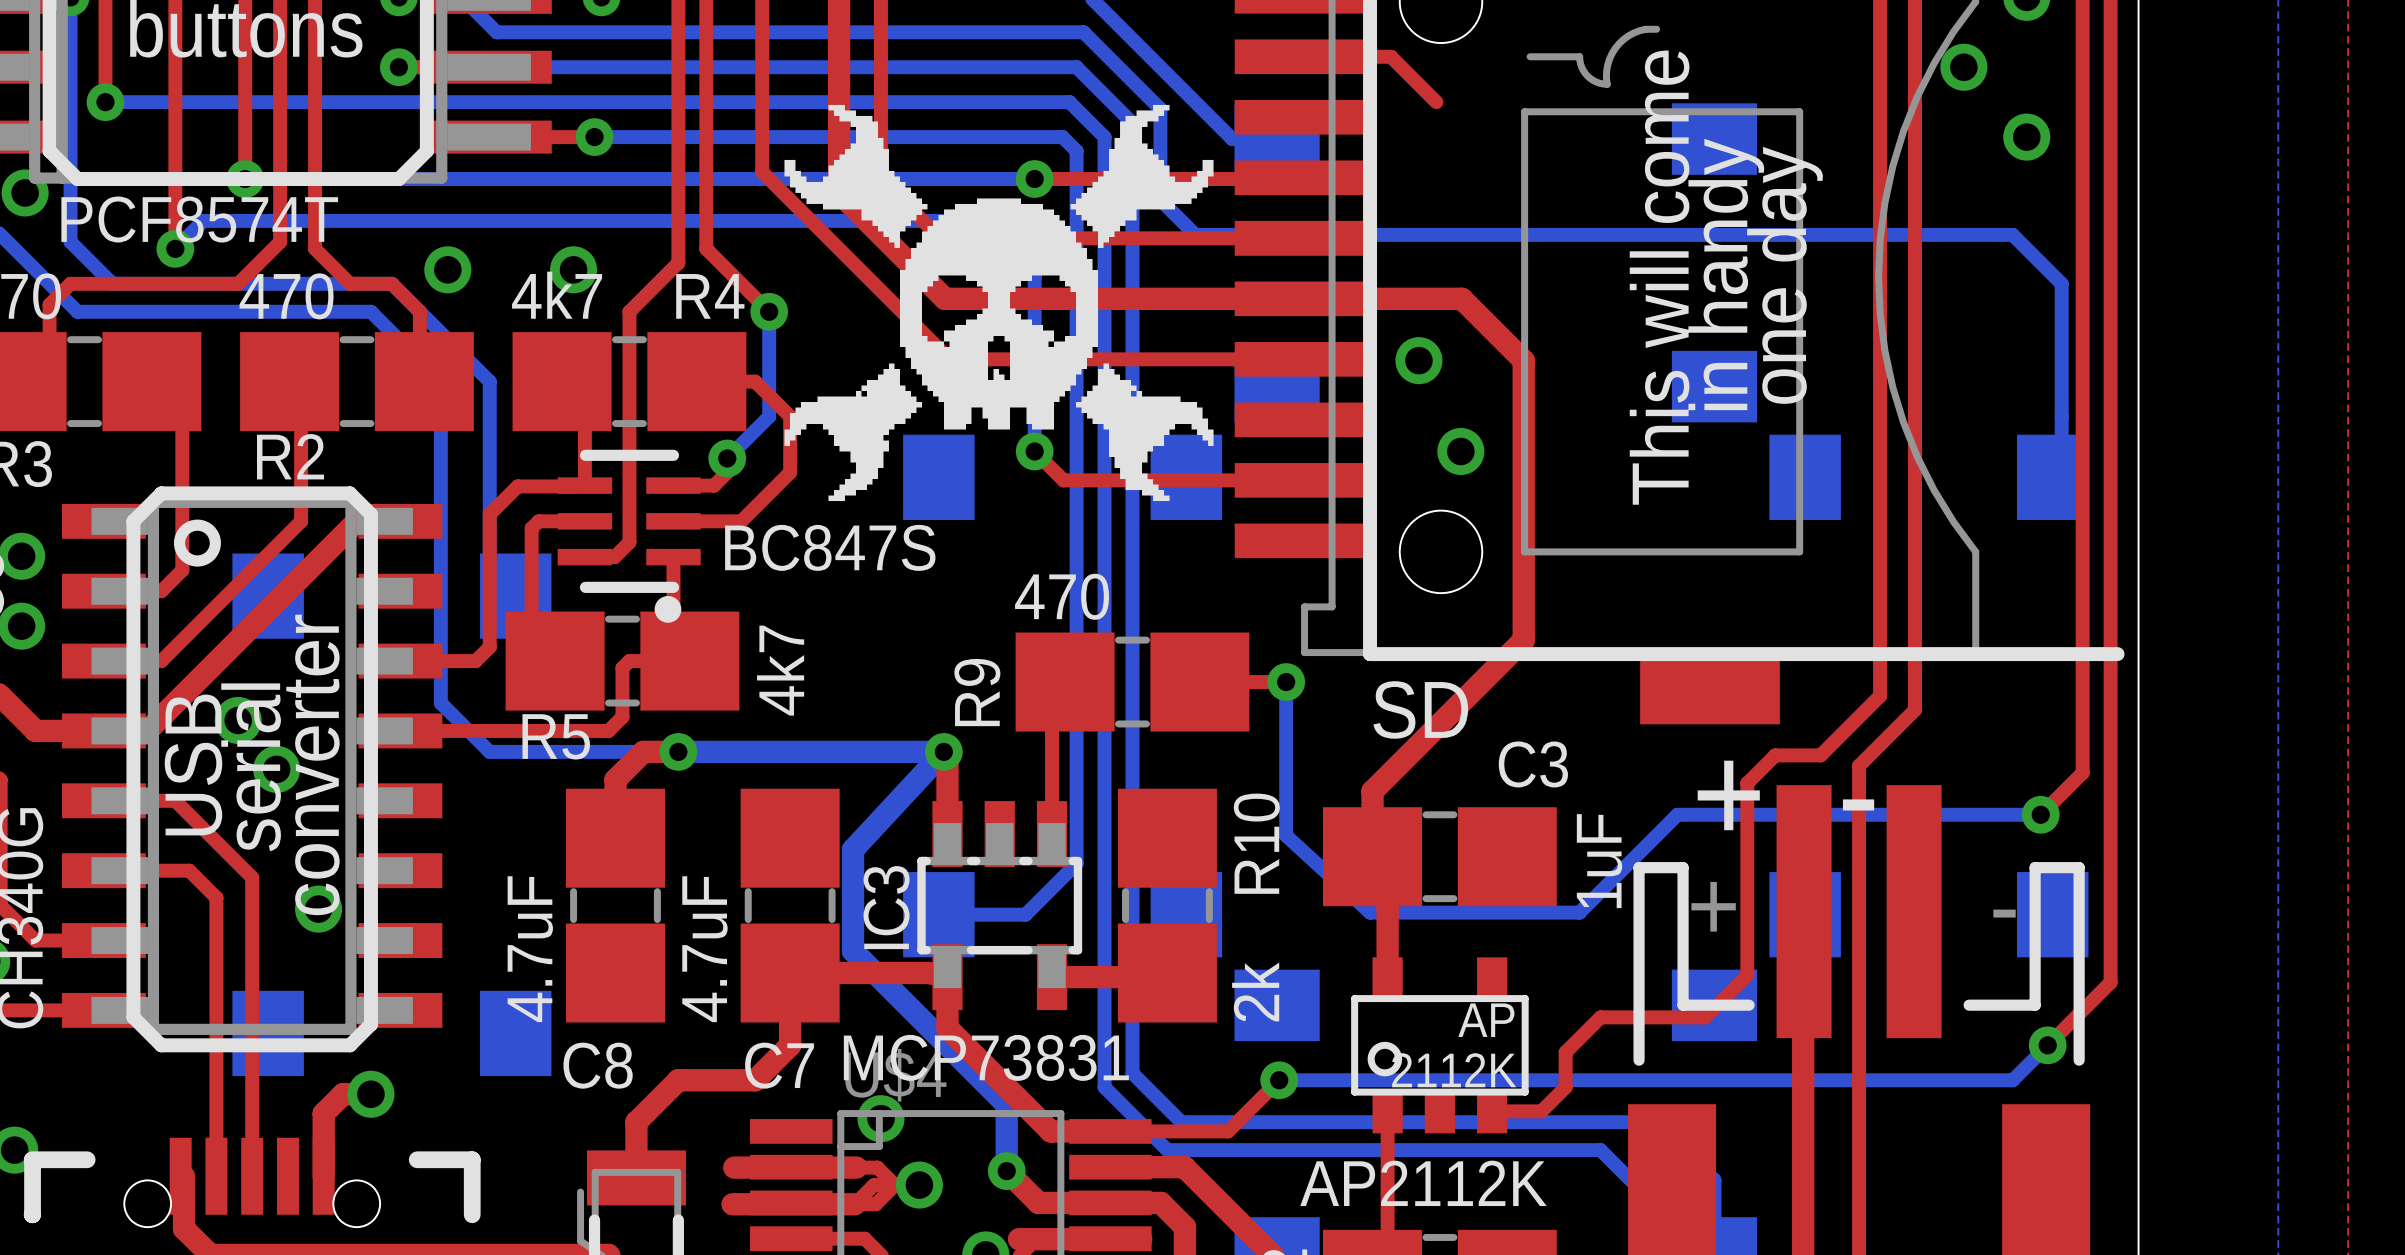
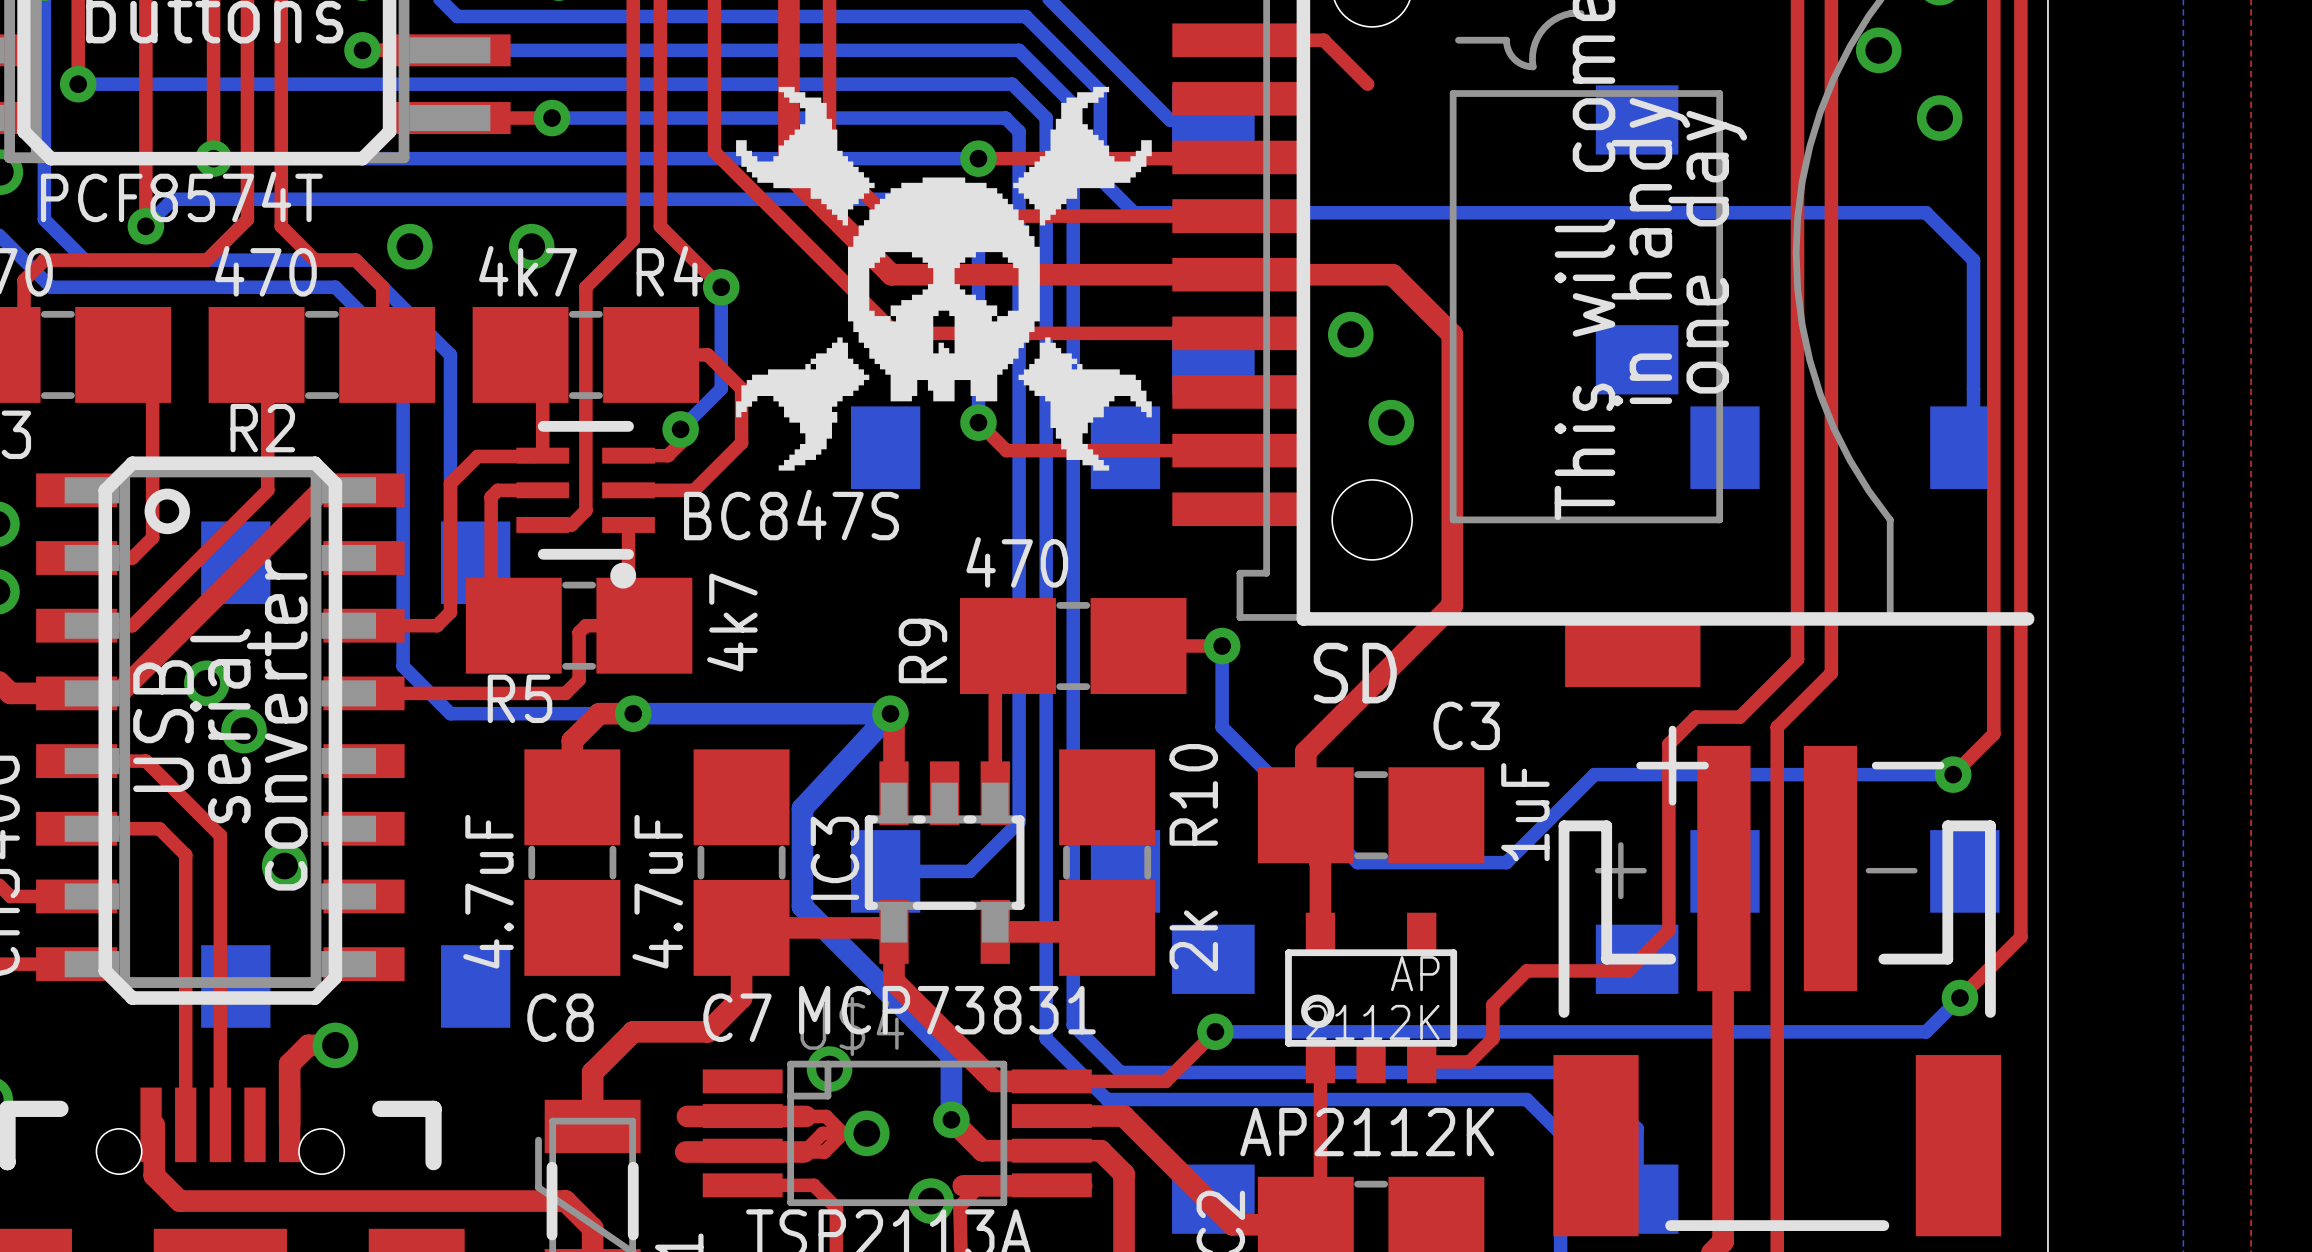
bottom track: (1286, 765) (1286, 835) (1370, 912) (1579, 912) (1677, 814) -> (1222, 727) (1357, 862) (1506, 862) (1594, 774) (1601, 774)

